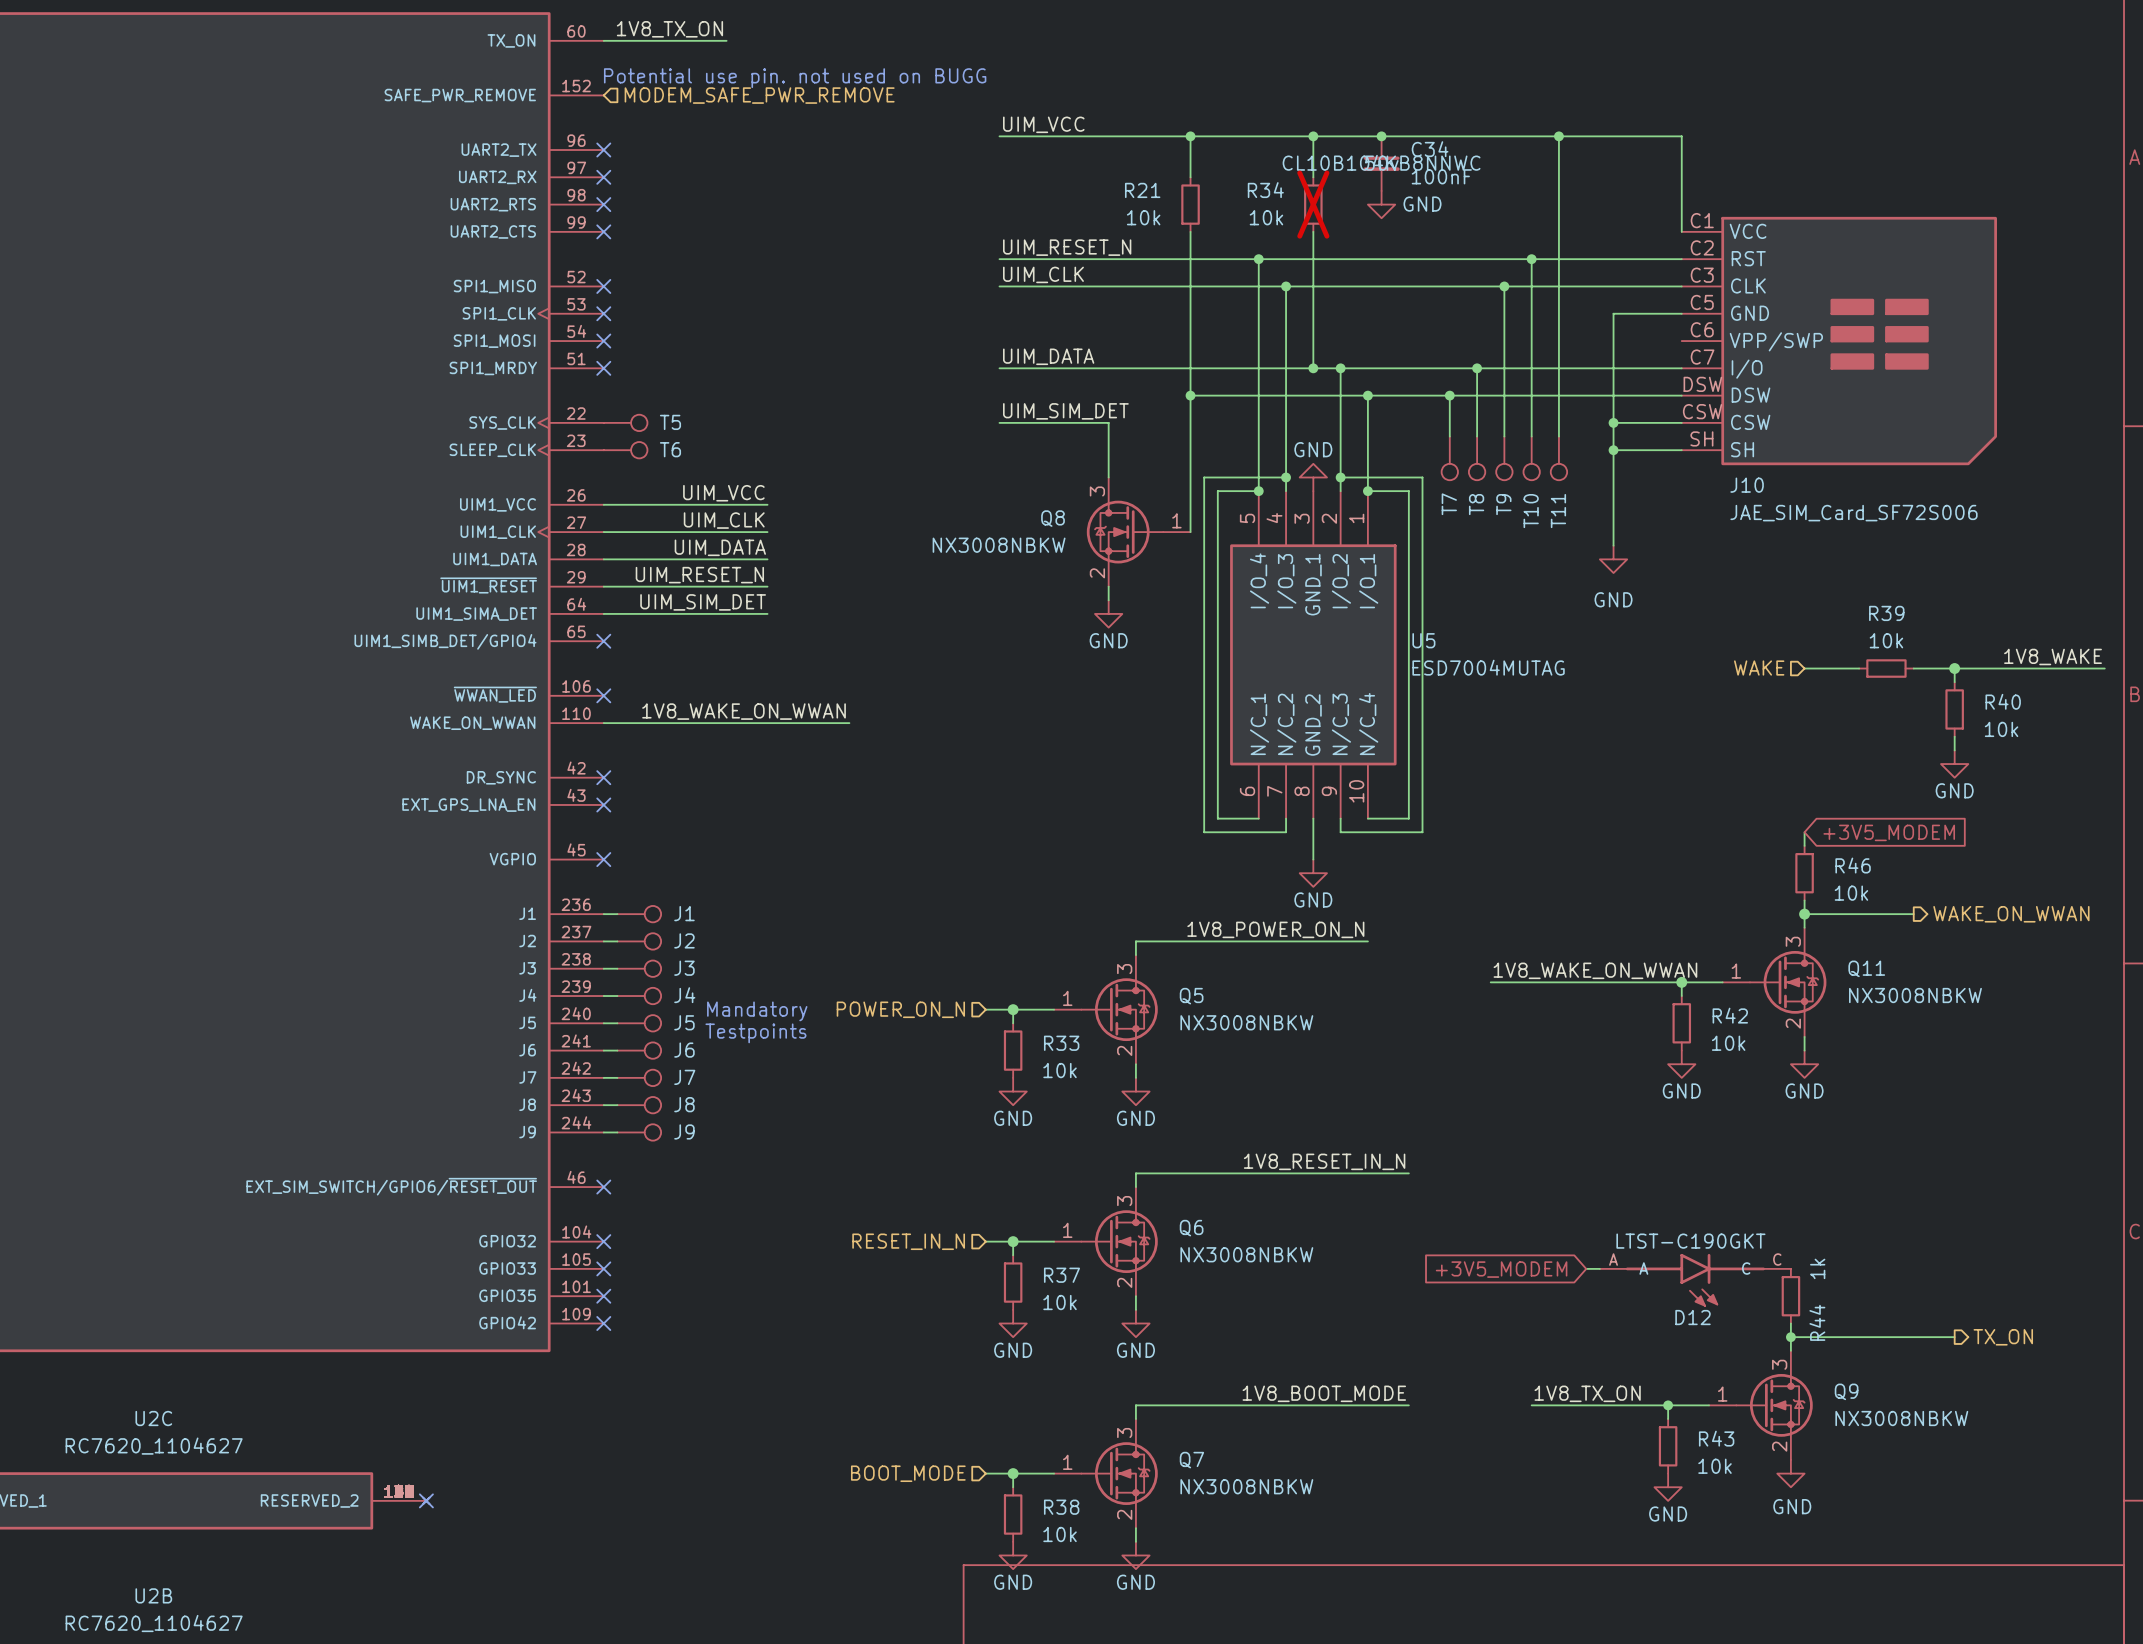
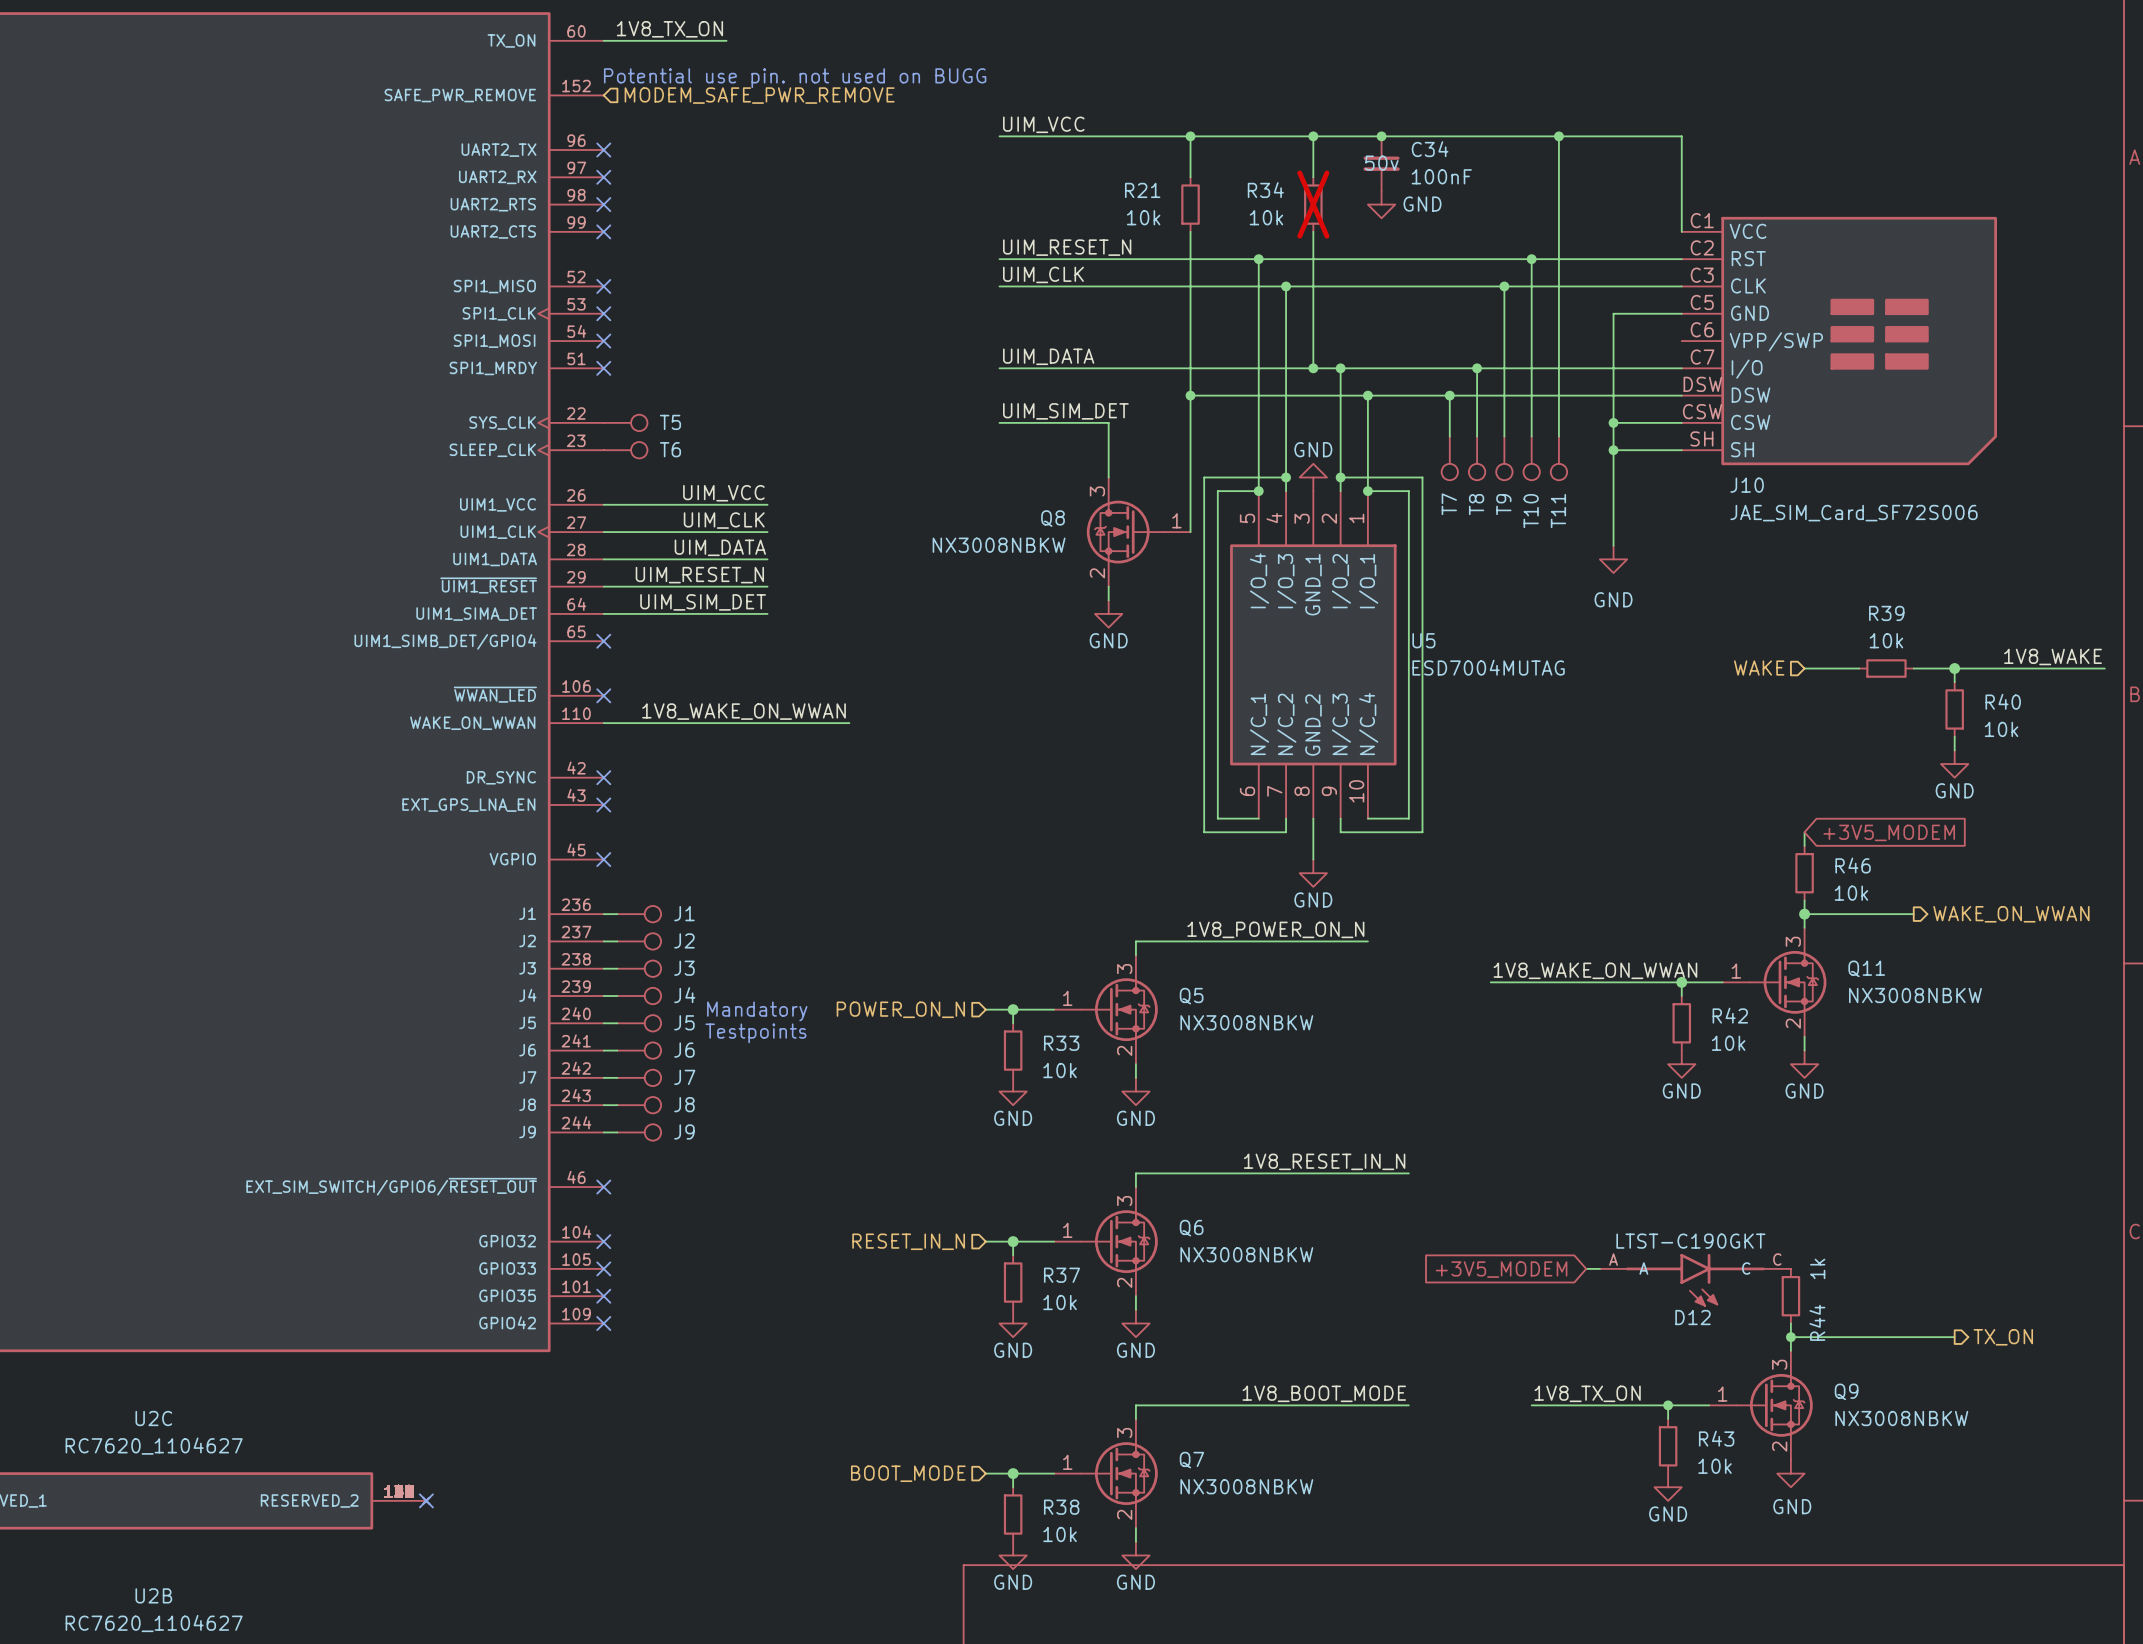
C34 text: CL10B104KB8NNWC (1381, 162) -> none

